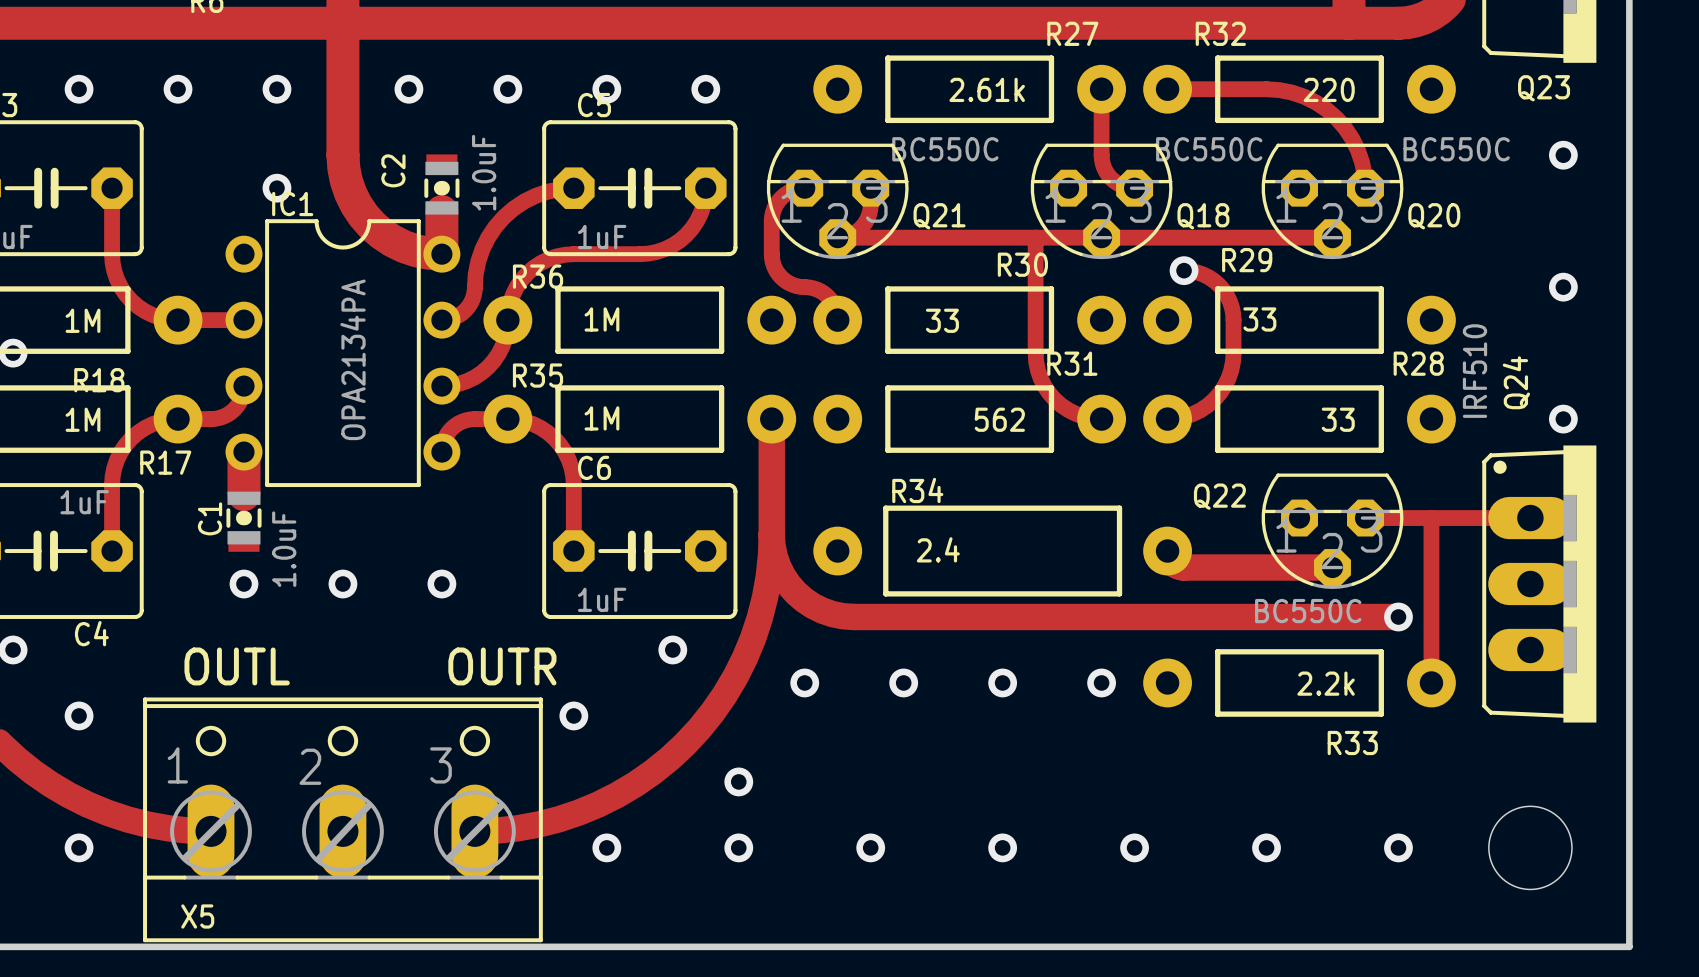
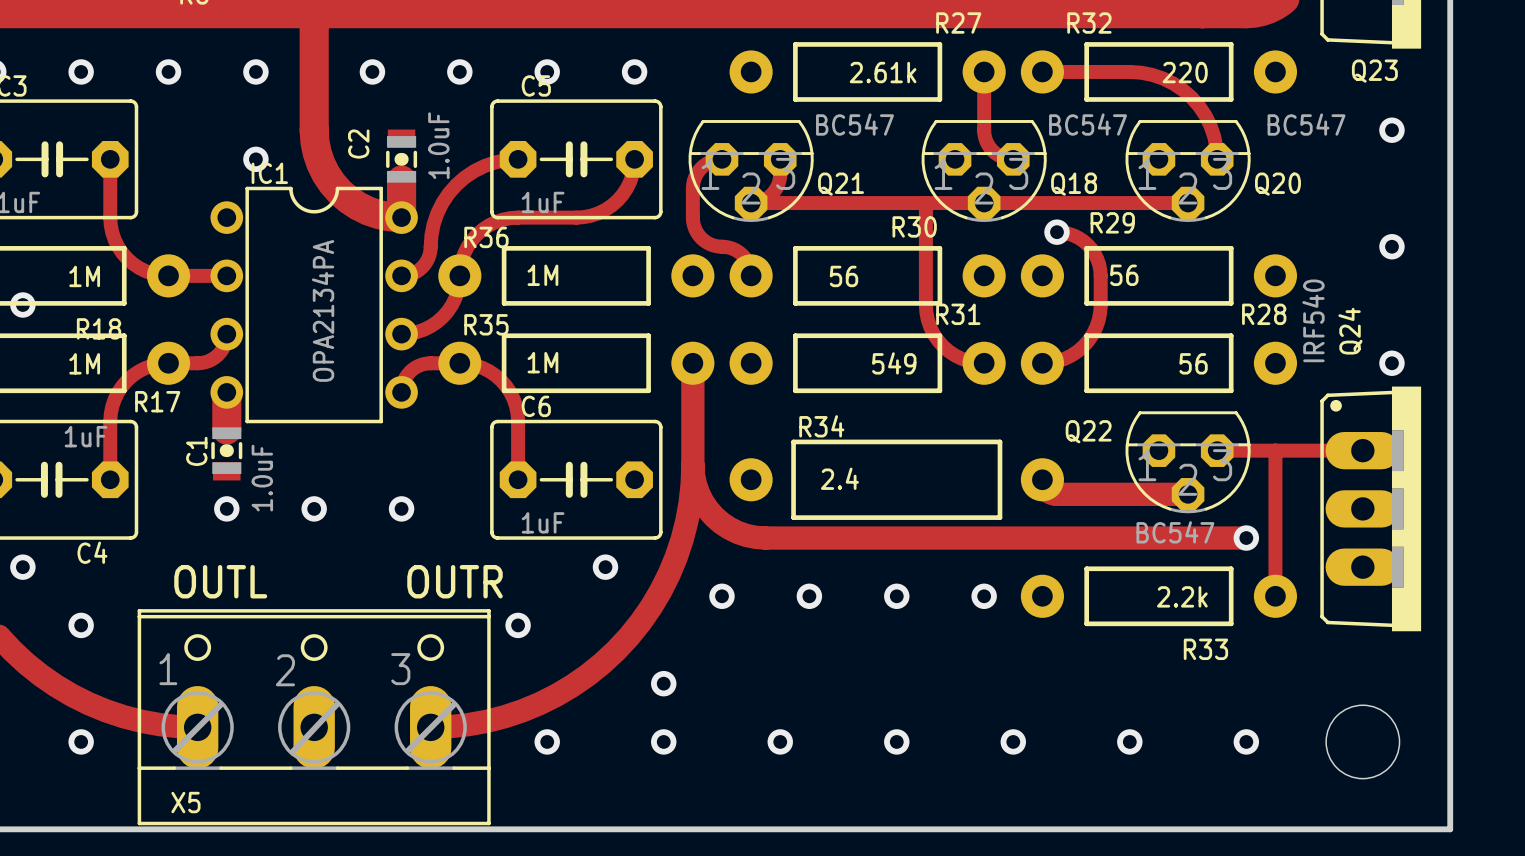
Q21 value: BC550C (945, 149) -> BC547 (854, 124)
Q18 value: BC550C (1209, 149) -> BC547 (1088, 124)
Q20 value: BC550C (1456, 149) -> BC547 (1306, 124)
R29 value: 33 (1259, 319) -> 56 (1124, 275)
R30 value: 33 (942, 320) -> 56 (844, 276)
Q24 value: IRF510 (1474, 371) -> IRF540 (1313, 320)
R31 value: 562 (999, 419) -> 549 (894, 363)
R28 value: 33 (1338, 419) -> 56 (1193, 363)
Q22 value: BC550C (1308, 611) -> BC547 (1175, 532)

